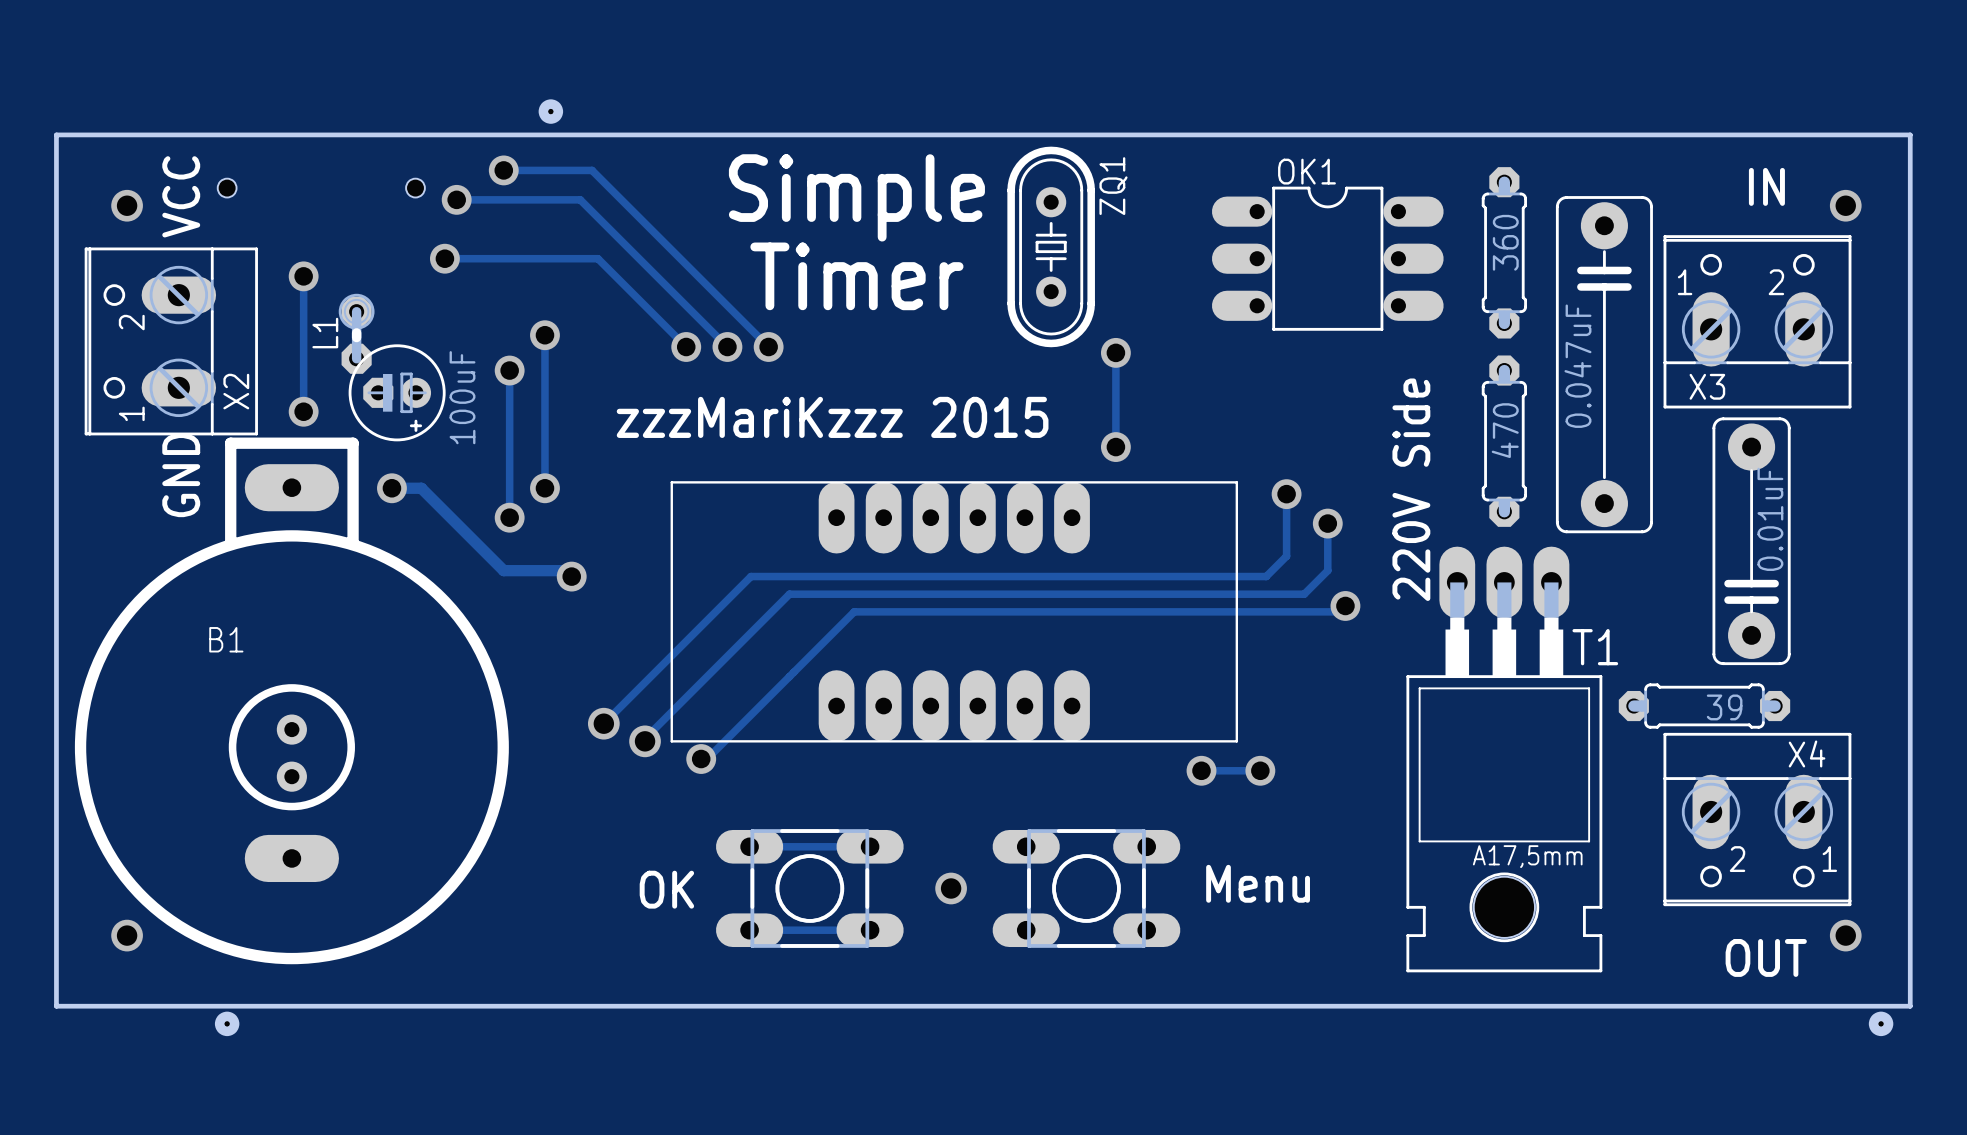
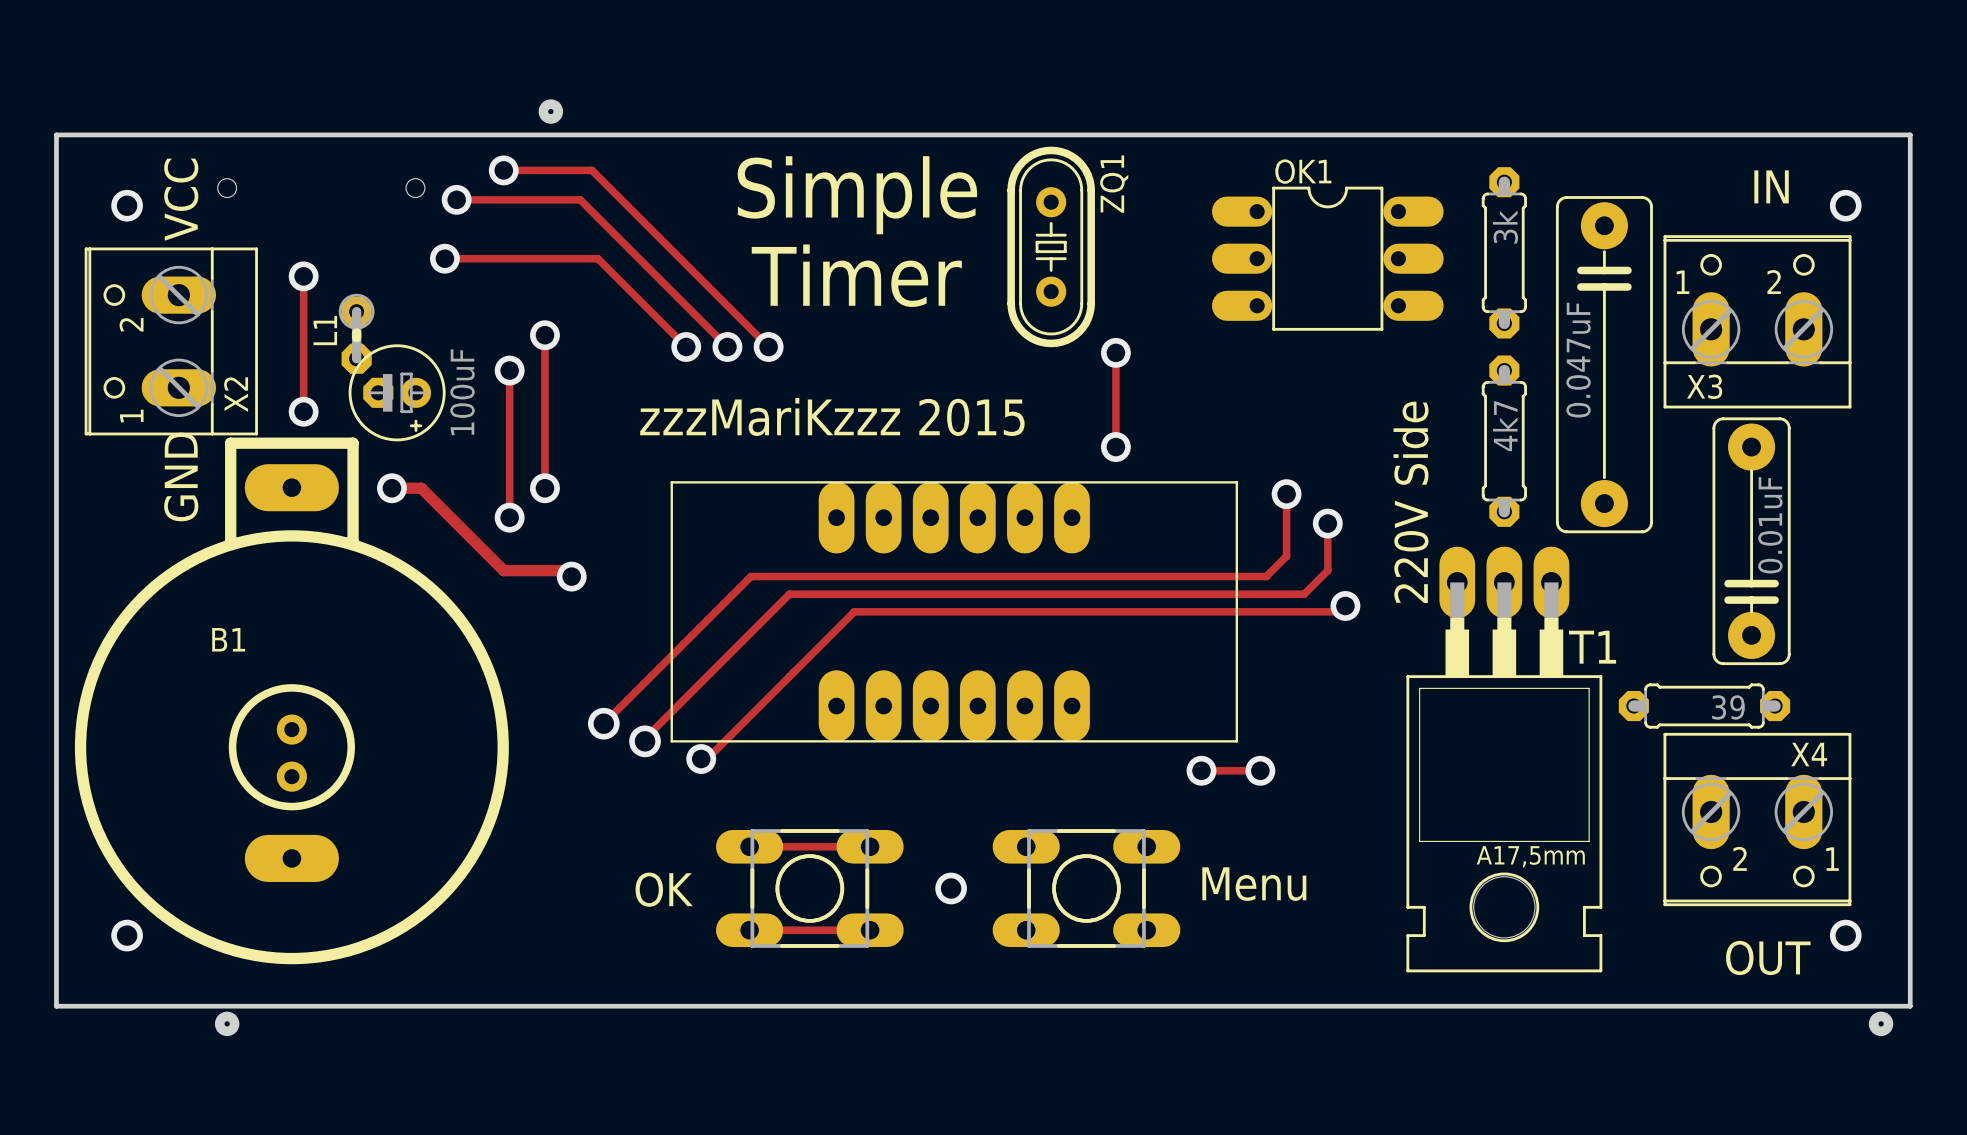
part value: 360 (1505, 242) -> 3k (1505, 227)
part value: 470 (1505, 430) -> 4k7 (1505, 426)

